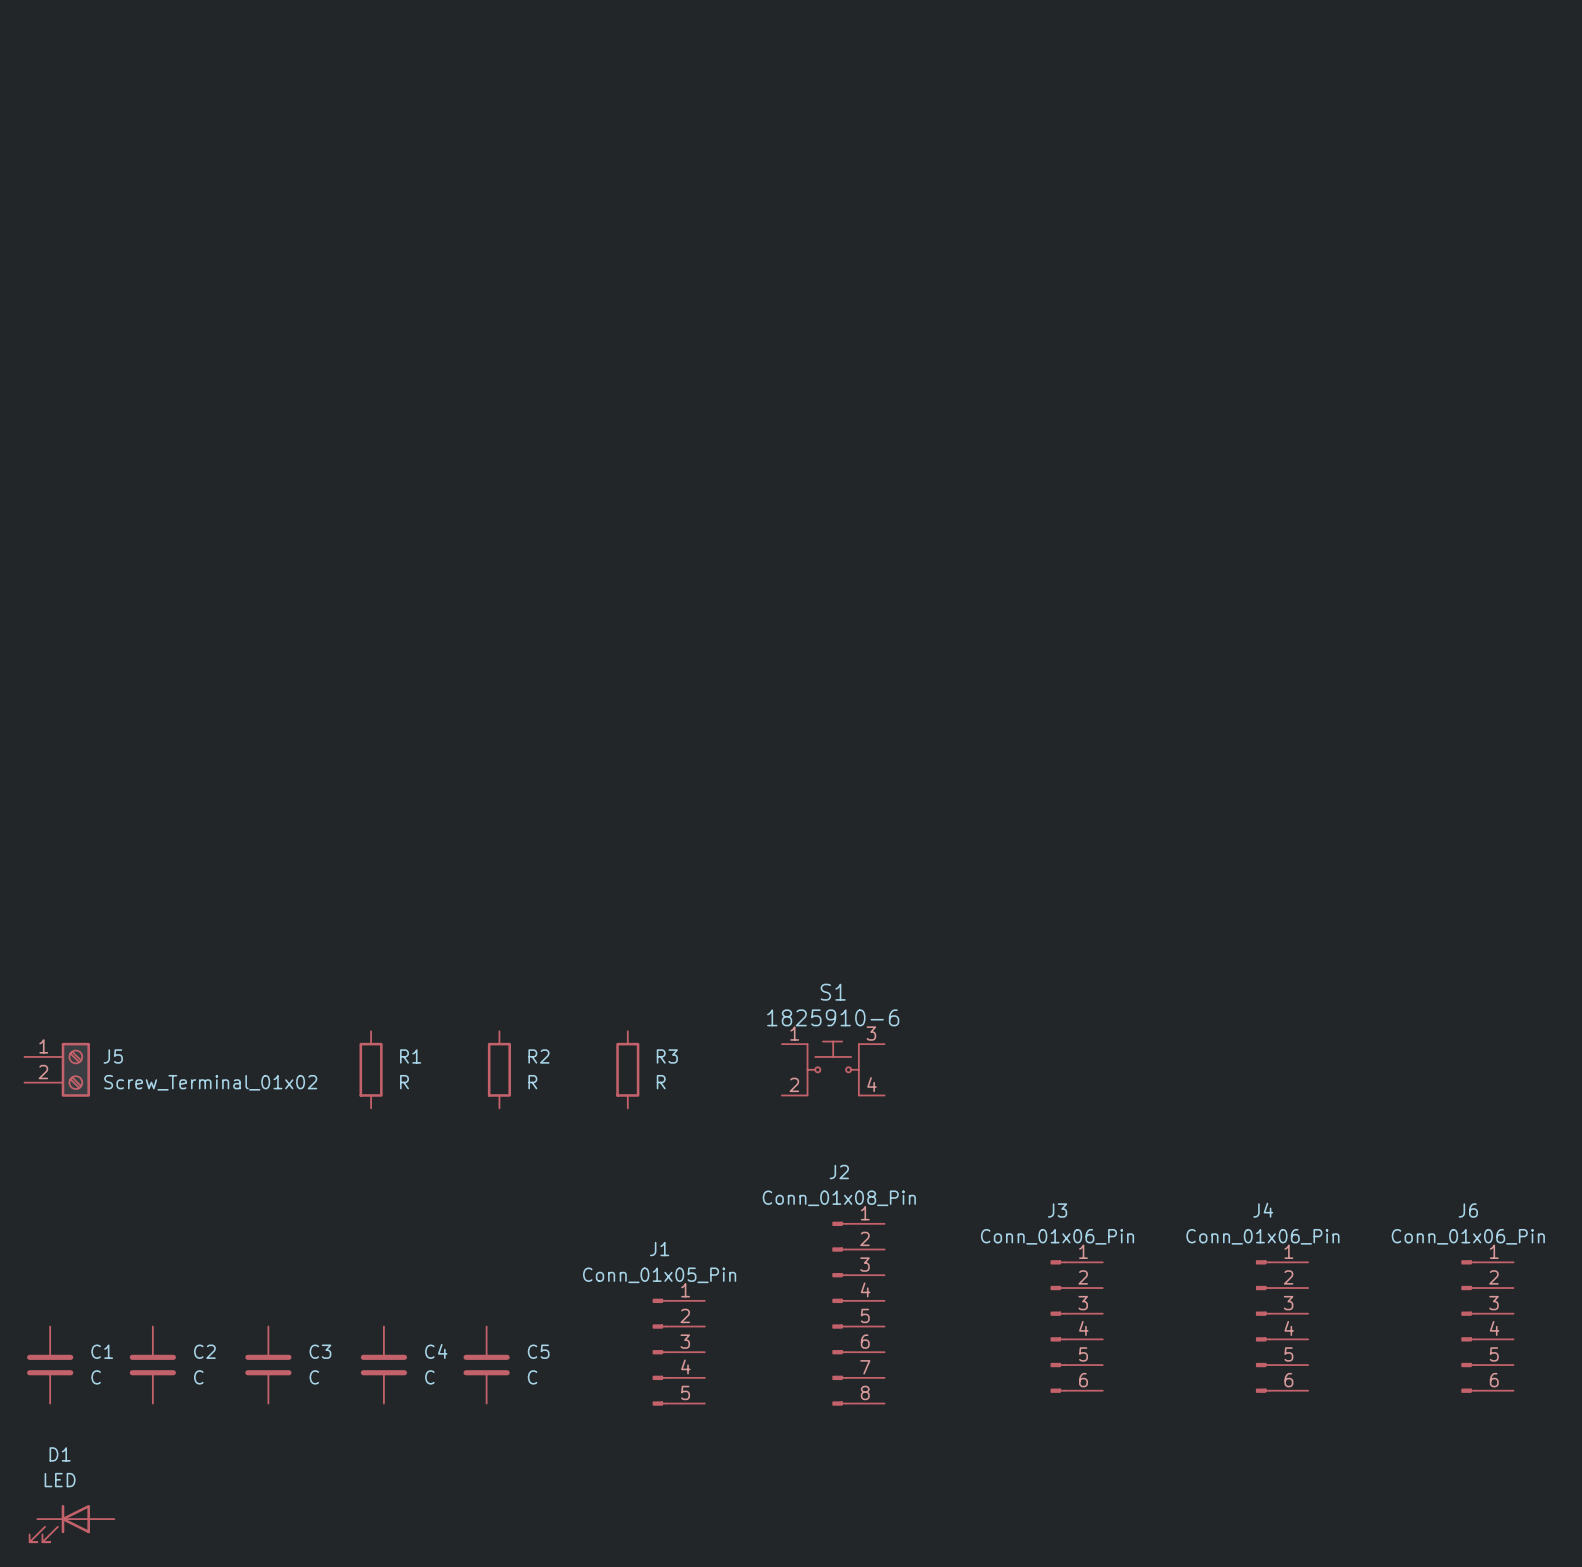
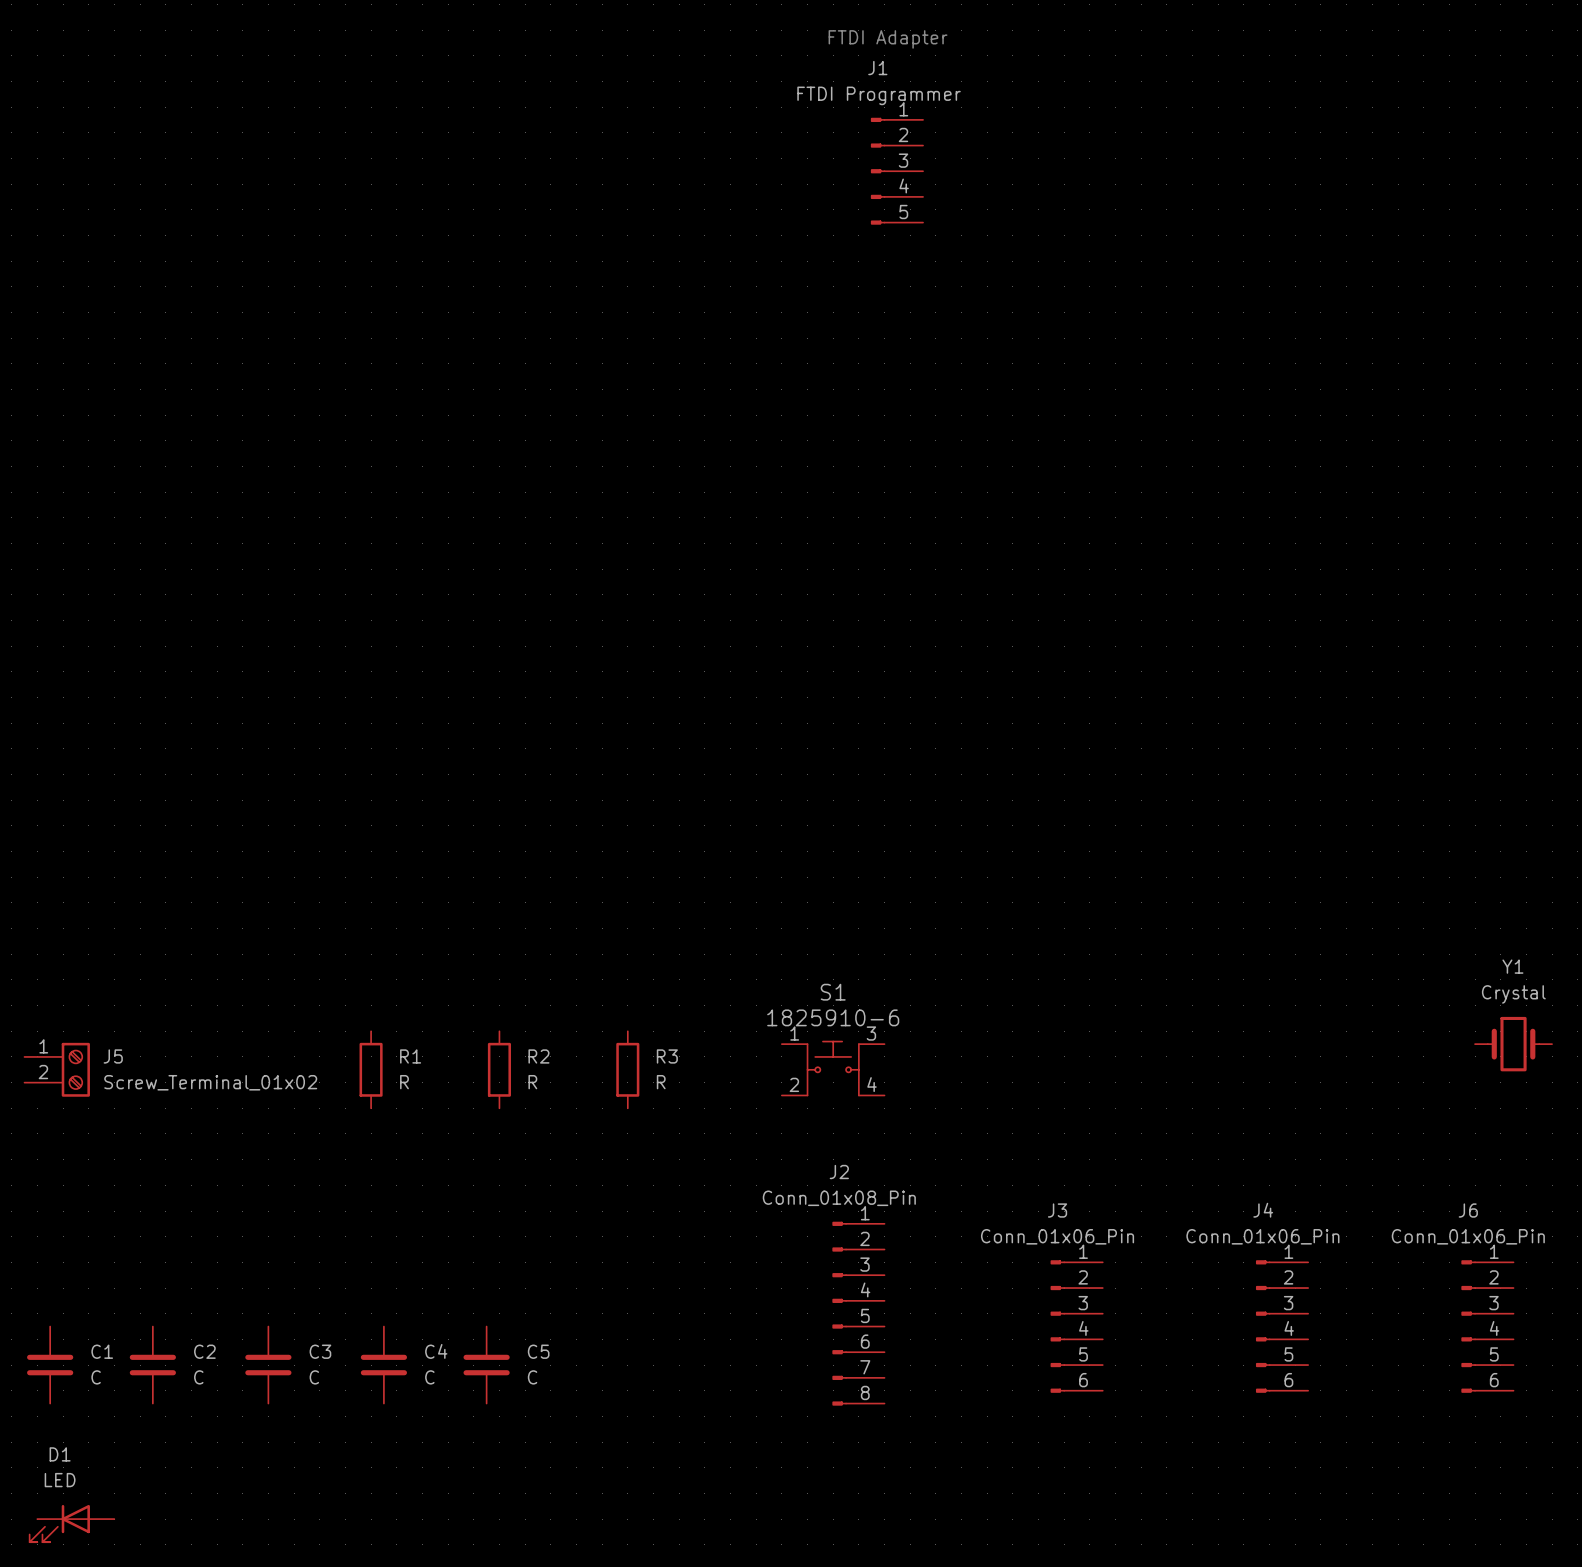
text: none -> FTDI Adapter (888, 39)
Y1: none -> Crystal (1513, 1044)
J1 value: Conn_01x05_Pin (659, 1275) -> FTDI Programmer (879, 95)
J1 position: (678, 1352) -> (896, 171)

